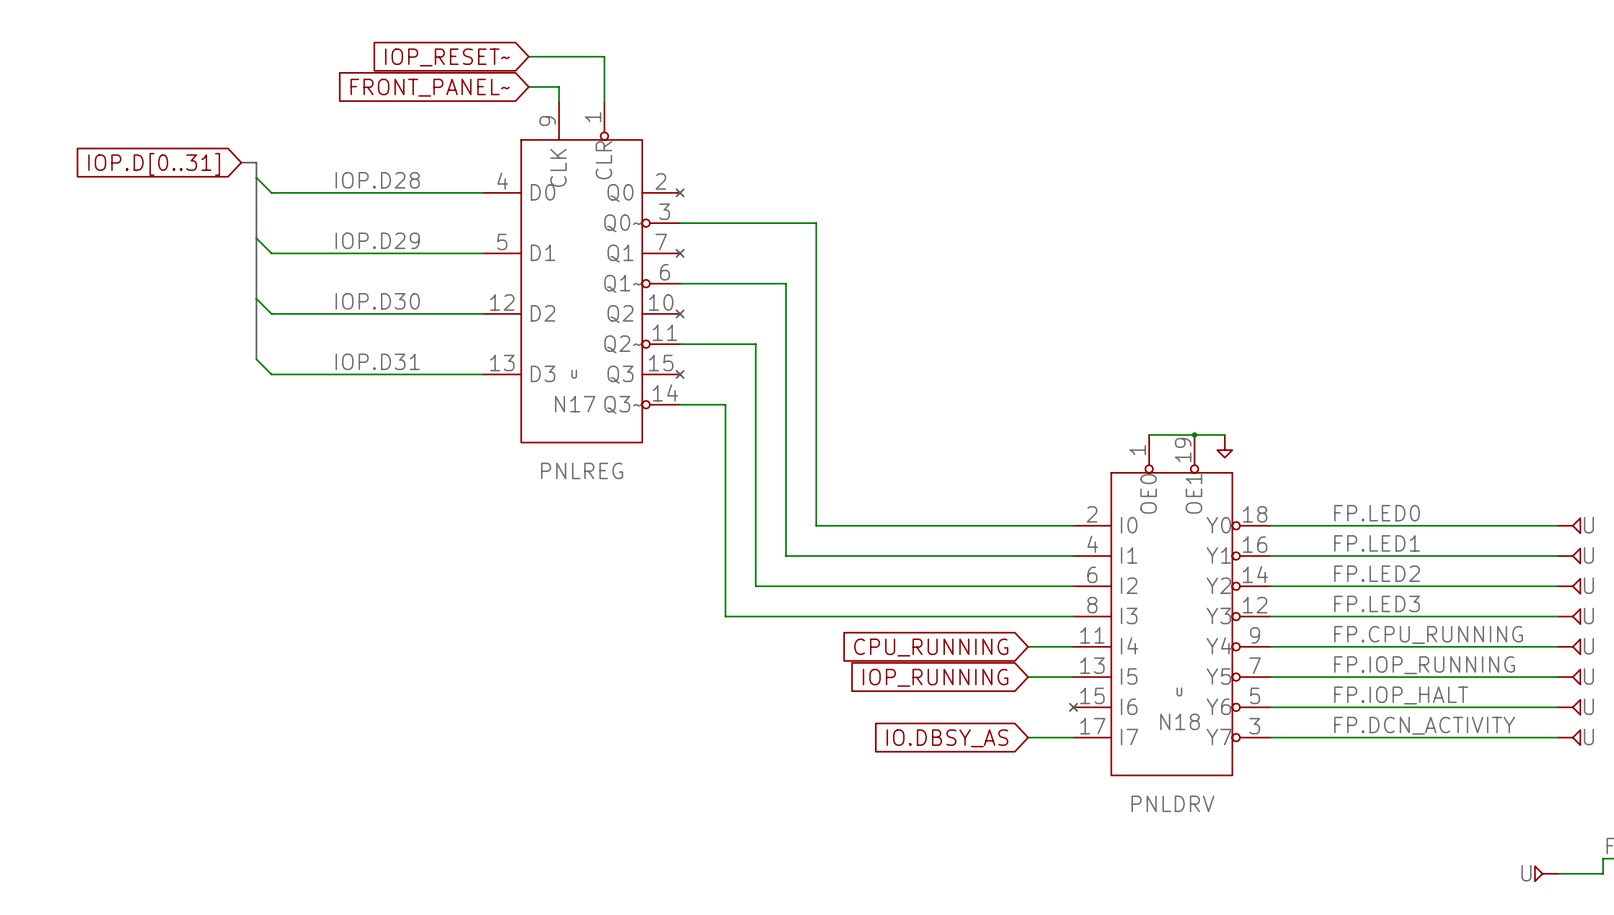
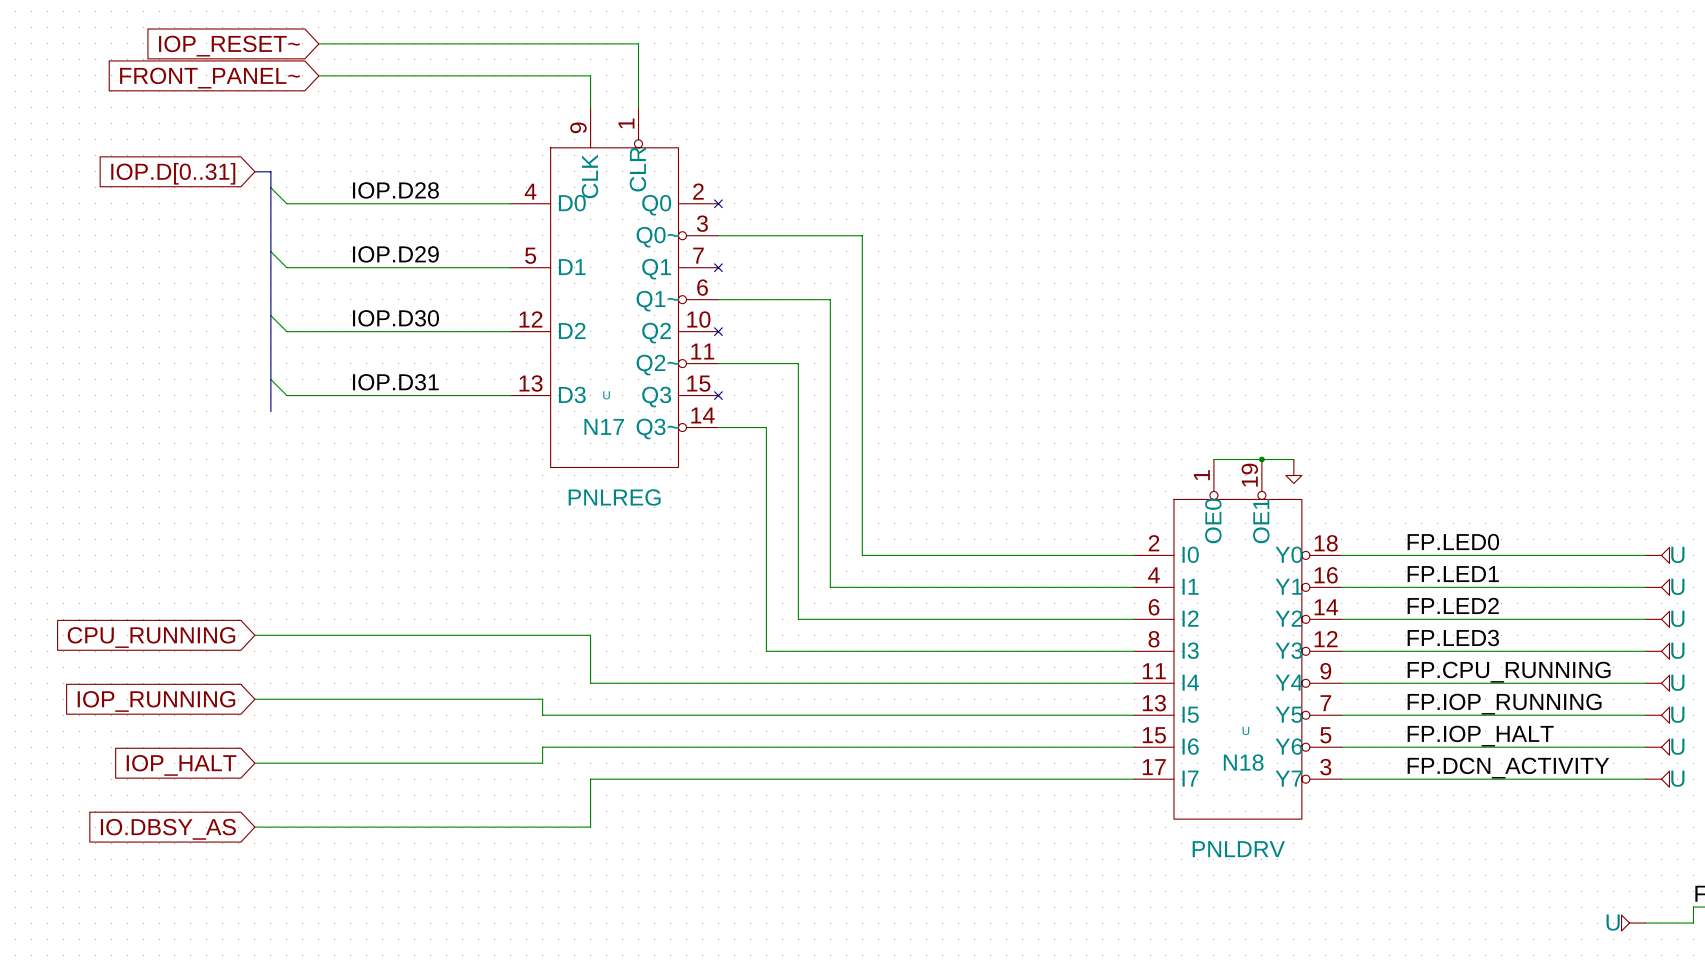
global label: none -> IOP_RESET~ (229, 46)
wire: (528, 56) (604, 56) -> (318, 43) (638, 43) (638, 59)
global label: IOP_RESET~ (447, 57) -> none
global label: none -> FRONT_PANEL~ (209, 78)
wire: (528, 86) (559, 86) -> (318, 75) (590, 75) (590, 91)
global label: FRONT_PANEL~ (430, 87) -> none
bus: none -> (270, 379) (270, 411)
wire: none -> (254, 635) (590, 635) (590, 683) (1086, 683)
global label: none -> CPU_RUNNING (151, 637)
global label: CPU_RUNNING (931, 647) -> none
wire: none -> (254, 699) (542, 699) (542, 715) (1086, 715)
global label: none -> IOP_RUNNING (156, 701)
global label: IOP_RUNNING (935, 677) -> none
wire: none -> (1134, 747) (542, 747) (542, 763) (254, 763)
no-connect mark: (1073, 707) -> none
global label: none -> IOP_HALT (181, 765)
wire: none -> (1086, 779) (590, 779) (590, 827) (254, 827)
global label: IO.DBSY_AS (947, 738) -> none
global label: none -> IO.DBSY_AS (168, 829)

